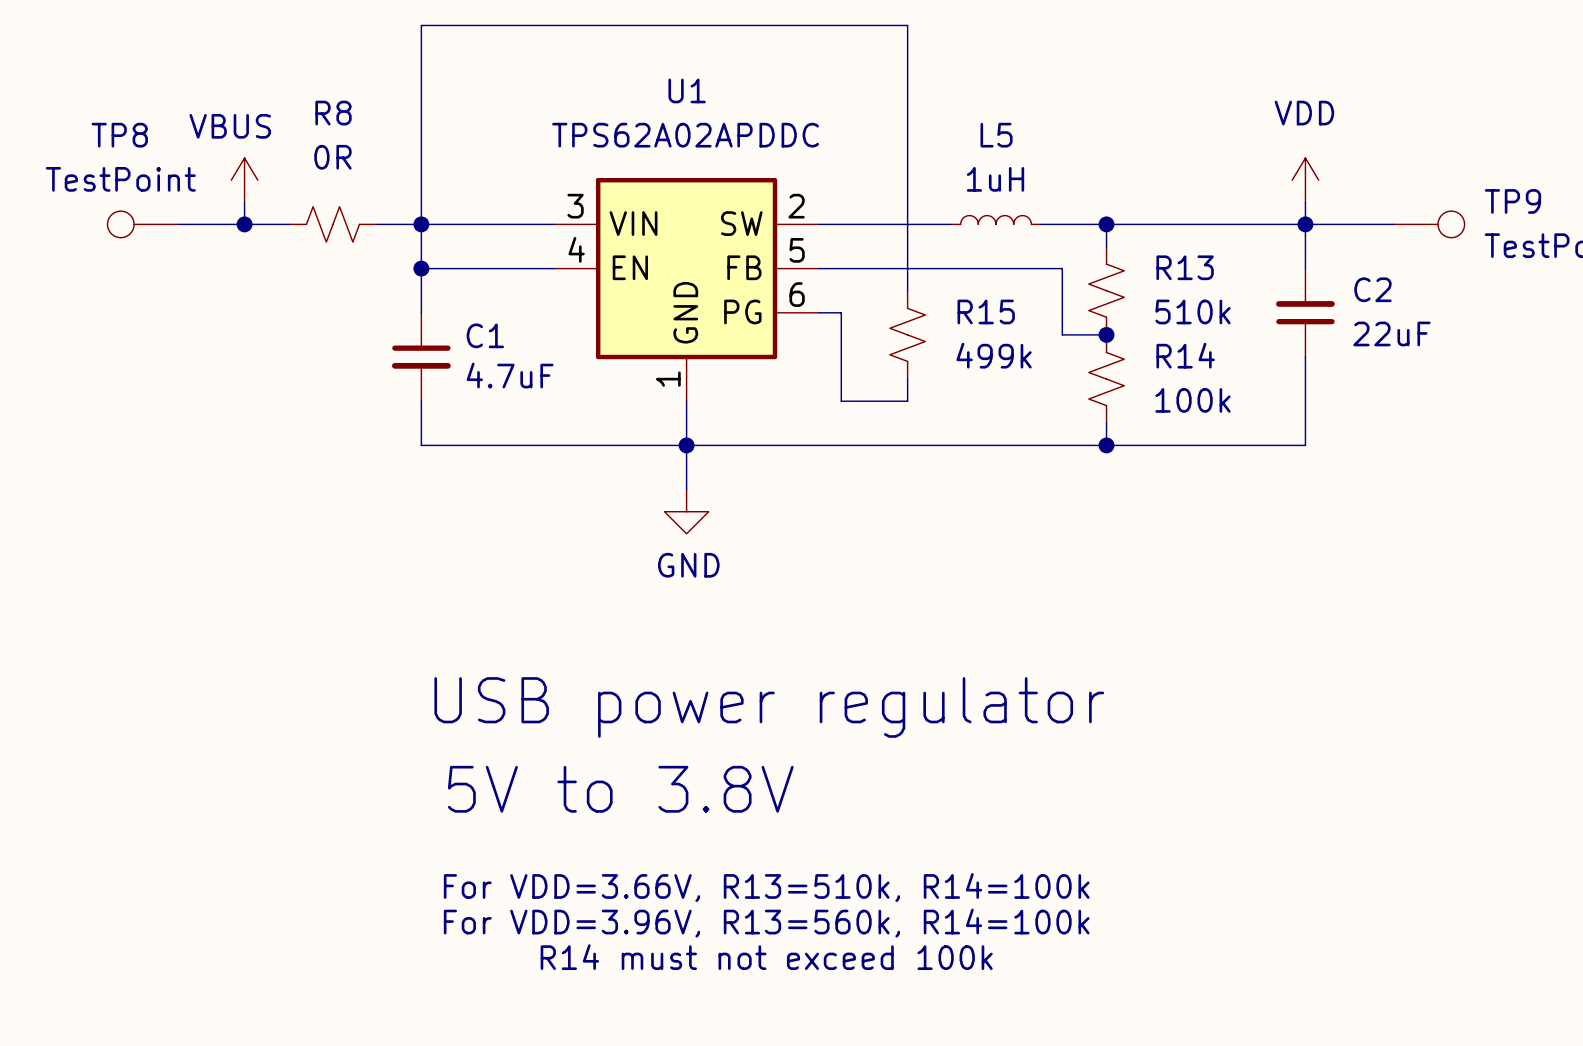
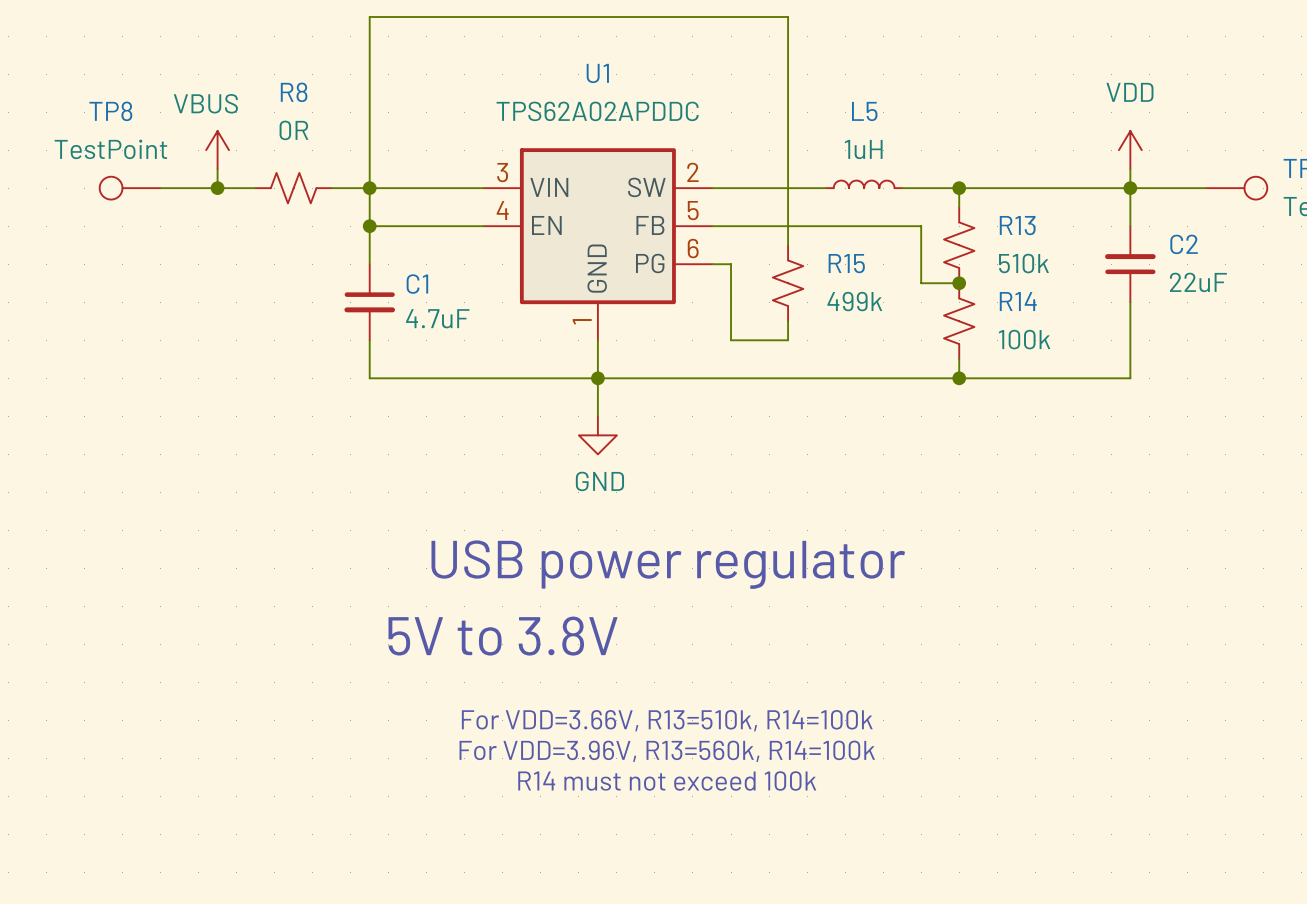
text position: USB power regulator (769, 707) -> USB power regulator (668, 564)
text position: 5V to 3.8V (620, 789) -> 5V to 3.8V (503, 636)
text position: For VDD=3.66V, R13=510k, R14=100k (766, 887) -> For VDD=3.66V, R13=510k, R14=100k (667, 720)
text position: For VDD=3.96V, R13=560k, R14=100k (766, 923) -> For VDD=3.96V, R13=560k, R14=100k (667, 751)
text position: R14 must not exceed 100k (766, 957) -> R14 must not exceed 100k (667, 781)

